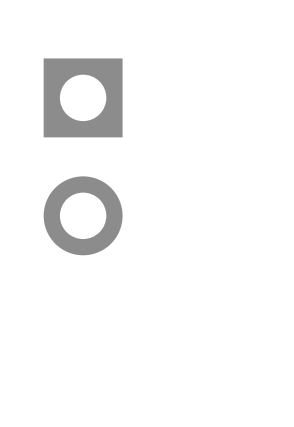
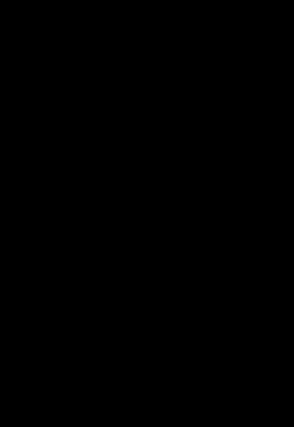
part: (83, 156) -> none

